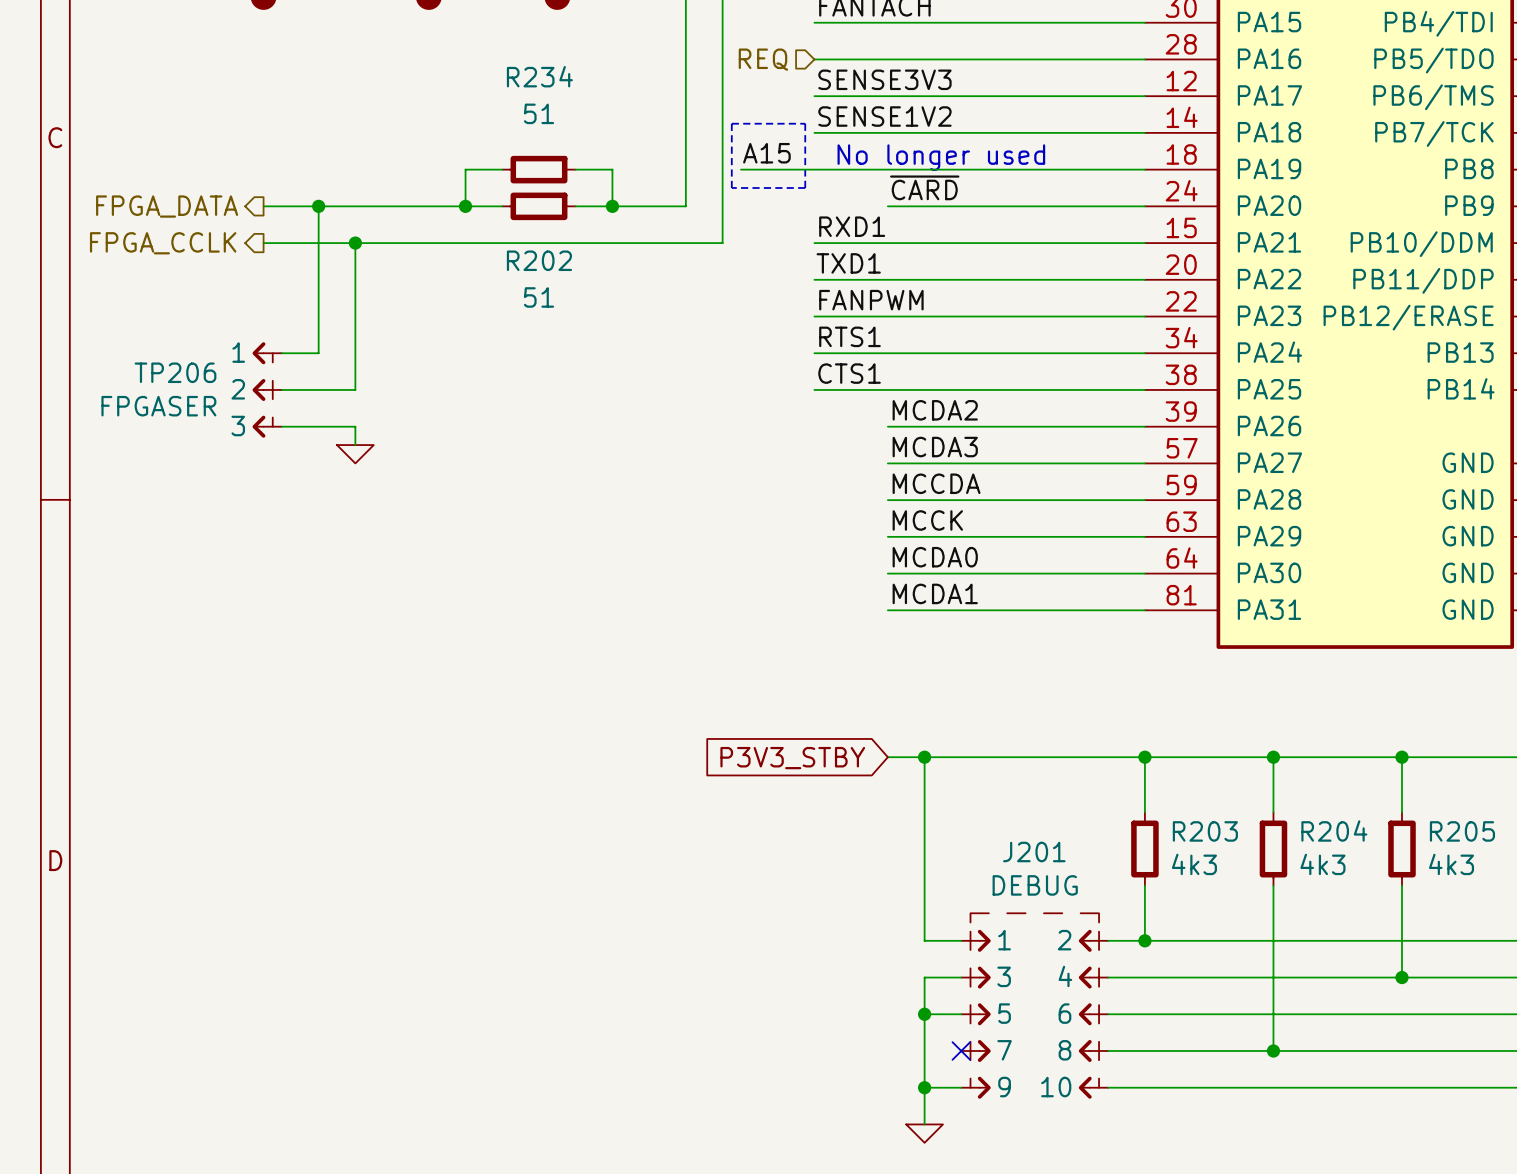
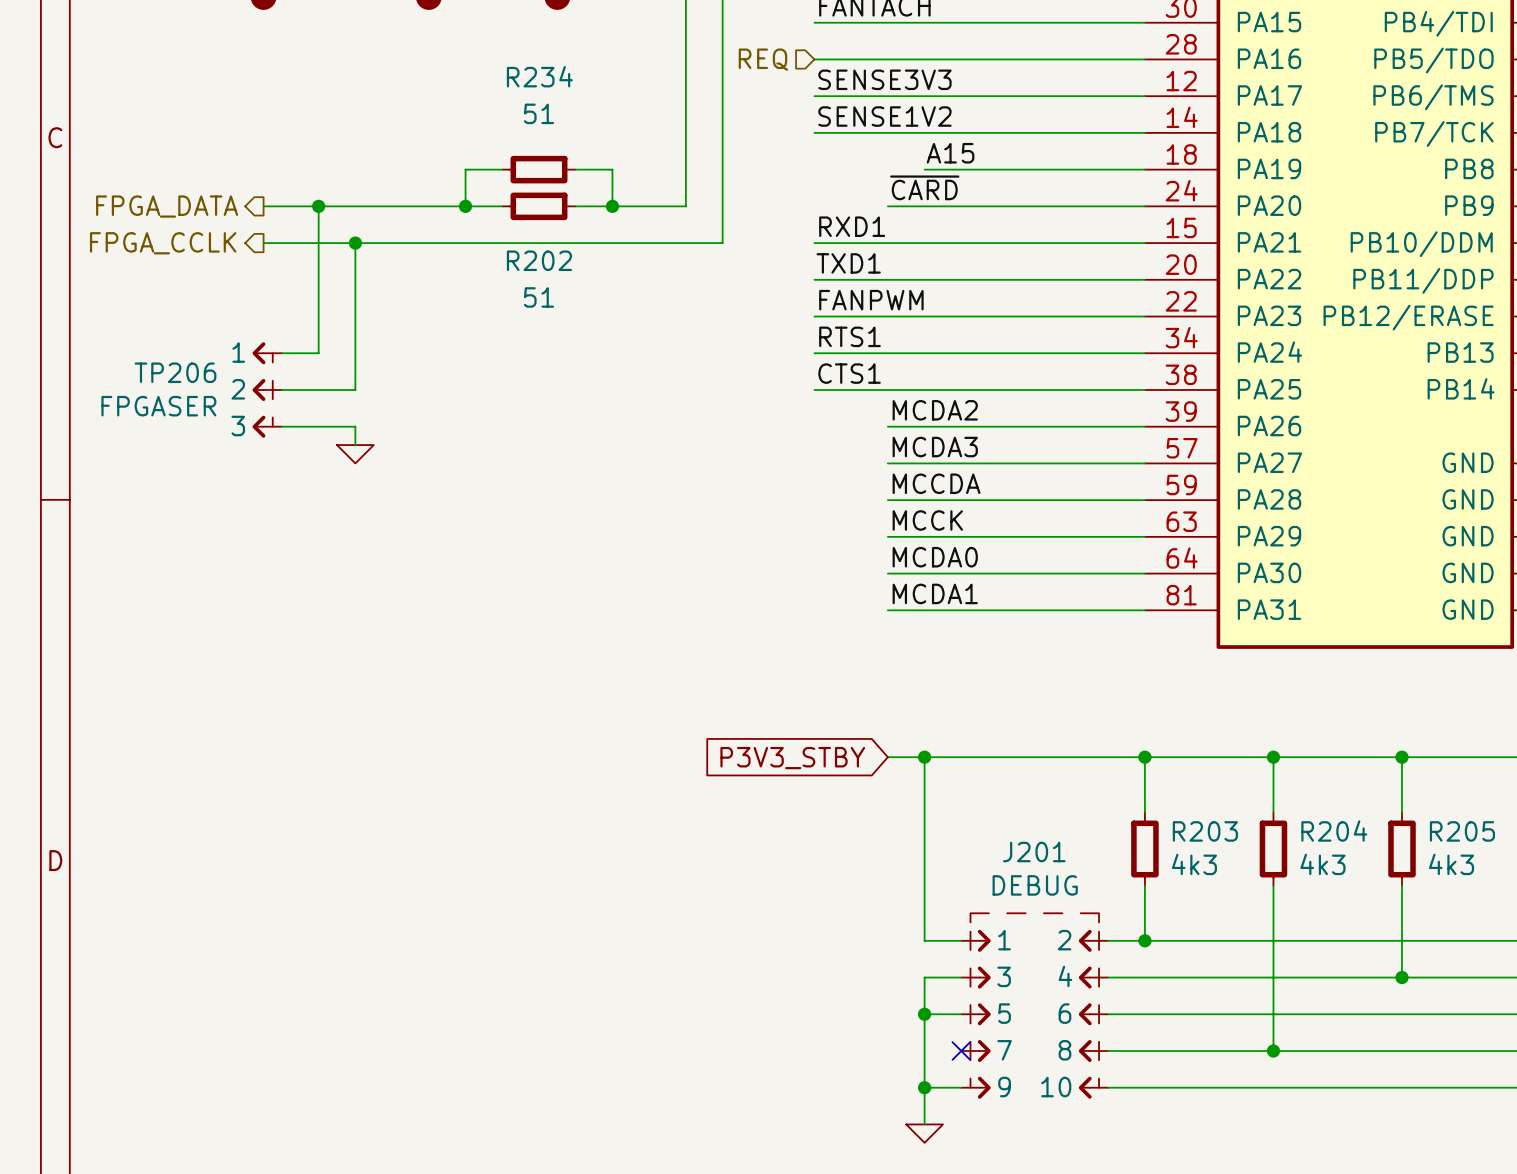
line: (731, 123) (805, 123) (805, 187) (731, 187) (731, 123) -> none
label position: A15 (766, 153) -> A15 (950, 153)
text: No longer used (941, 157) -> none
wire: (740, 169) (924, 169) -> none

